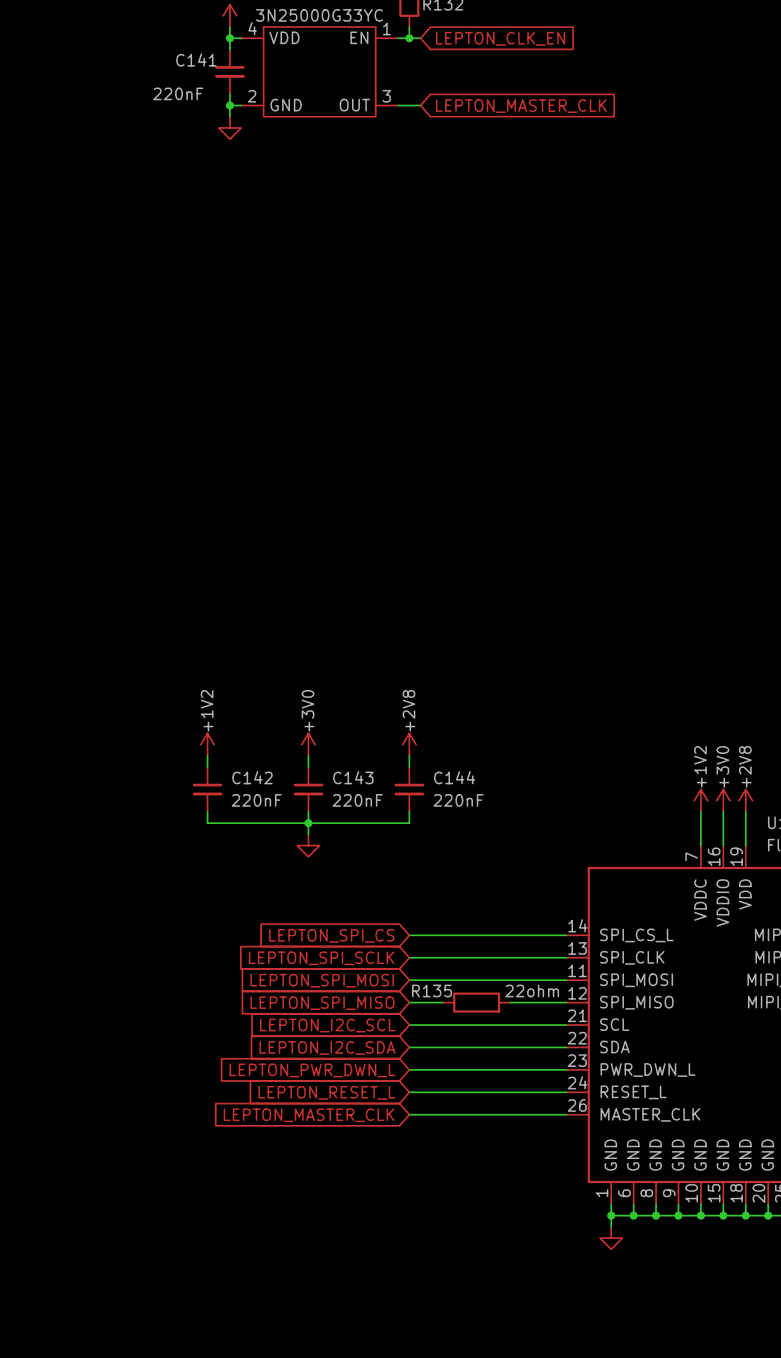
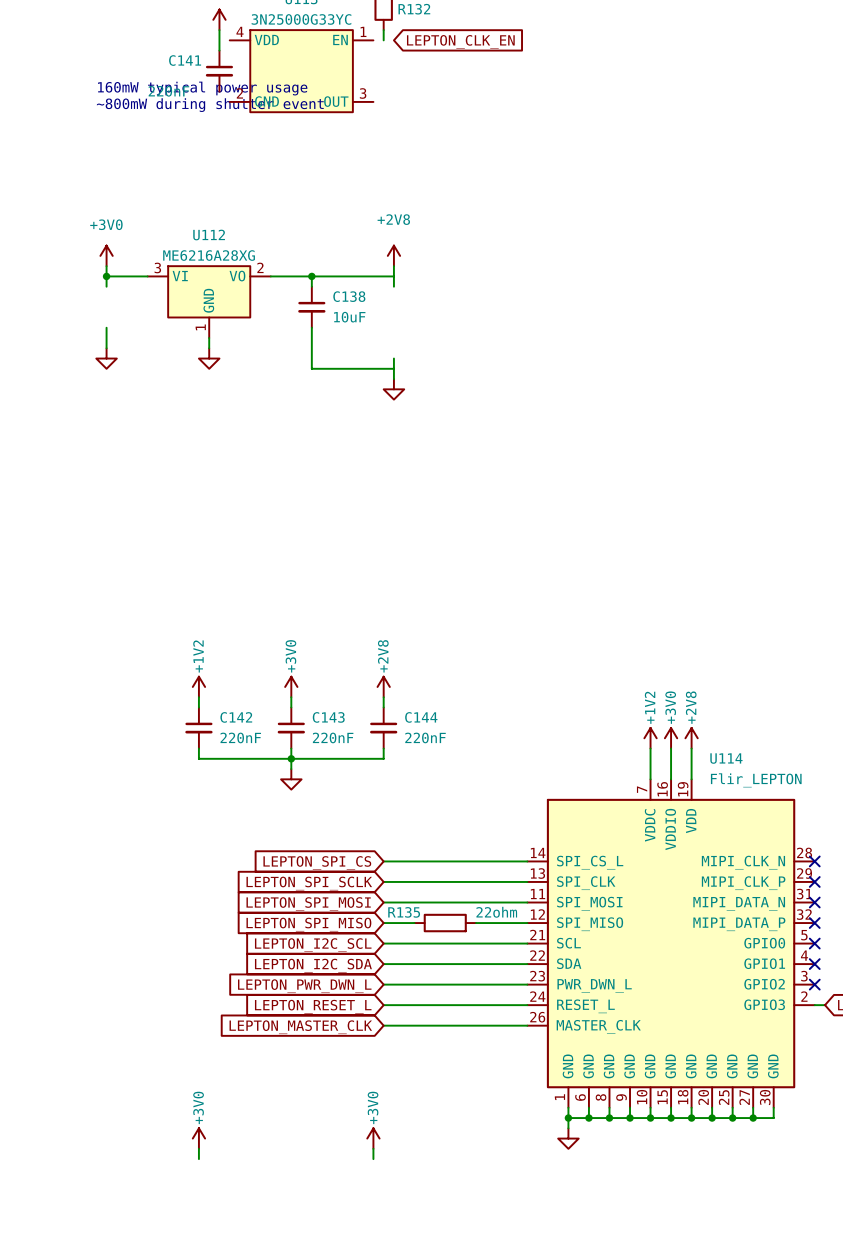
wire: (229, 38) (241, 38) -> none
junction: (229, 38) -> none
wire: (398, 38) (420, 38) -> none
junction: (409, 38) -> none
text: none -> 160mW typical power usage (202, 88)
wire: (229, 94) (229, 116) -> none
wire: (229, 105) (241, 105) -> none
junction: (229, 105) -> none
wire: (398, 105) (420, 105) -> none
global label: LEPTON_MASTER_CLK (521, 106) -> none
text: none -> ~800mW during shutter event (210, 105)
power symbol: (229, 127) -> none
power symbol: none -> +3V0 (106, 255)
power symbol: none -> +2V8 (393, 255)
wire: none -> (106, 266) (106, 286)
wire: none -> (393, 266) (393, 286)
wire: none -> (106, 276) (147, 276)
junction: none -> (106, 276)
wire: none -> (270, 276) (393, 276)
wire: none -> (311, 276) (311, 286)
junction: none -> (311, 276)
U112: none -> ME6216A28XG (209, 302)
C138: none -> 10uF (311, 307)
wire: none -> (106, 327) (106, 348)
wire: none -> (311, 327) (311, 368) (393, 368)
wire: none -> (209, 338) (209, 348)
power symbol: none -> (106, 358)
power symbol: none -> (209, 358)
wire: none -> (393, 358) (393, 379)
power symbol: none -> (393, 389)
power symbol: none -> +3V0 (198, 1138)
power symbol: none -> +3V0 (373, 1138)
wire: none -> (198, 1148) (198, 1159)
wire: none -> (373, 1148) (373, 1159)

